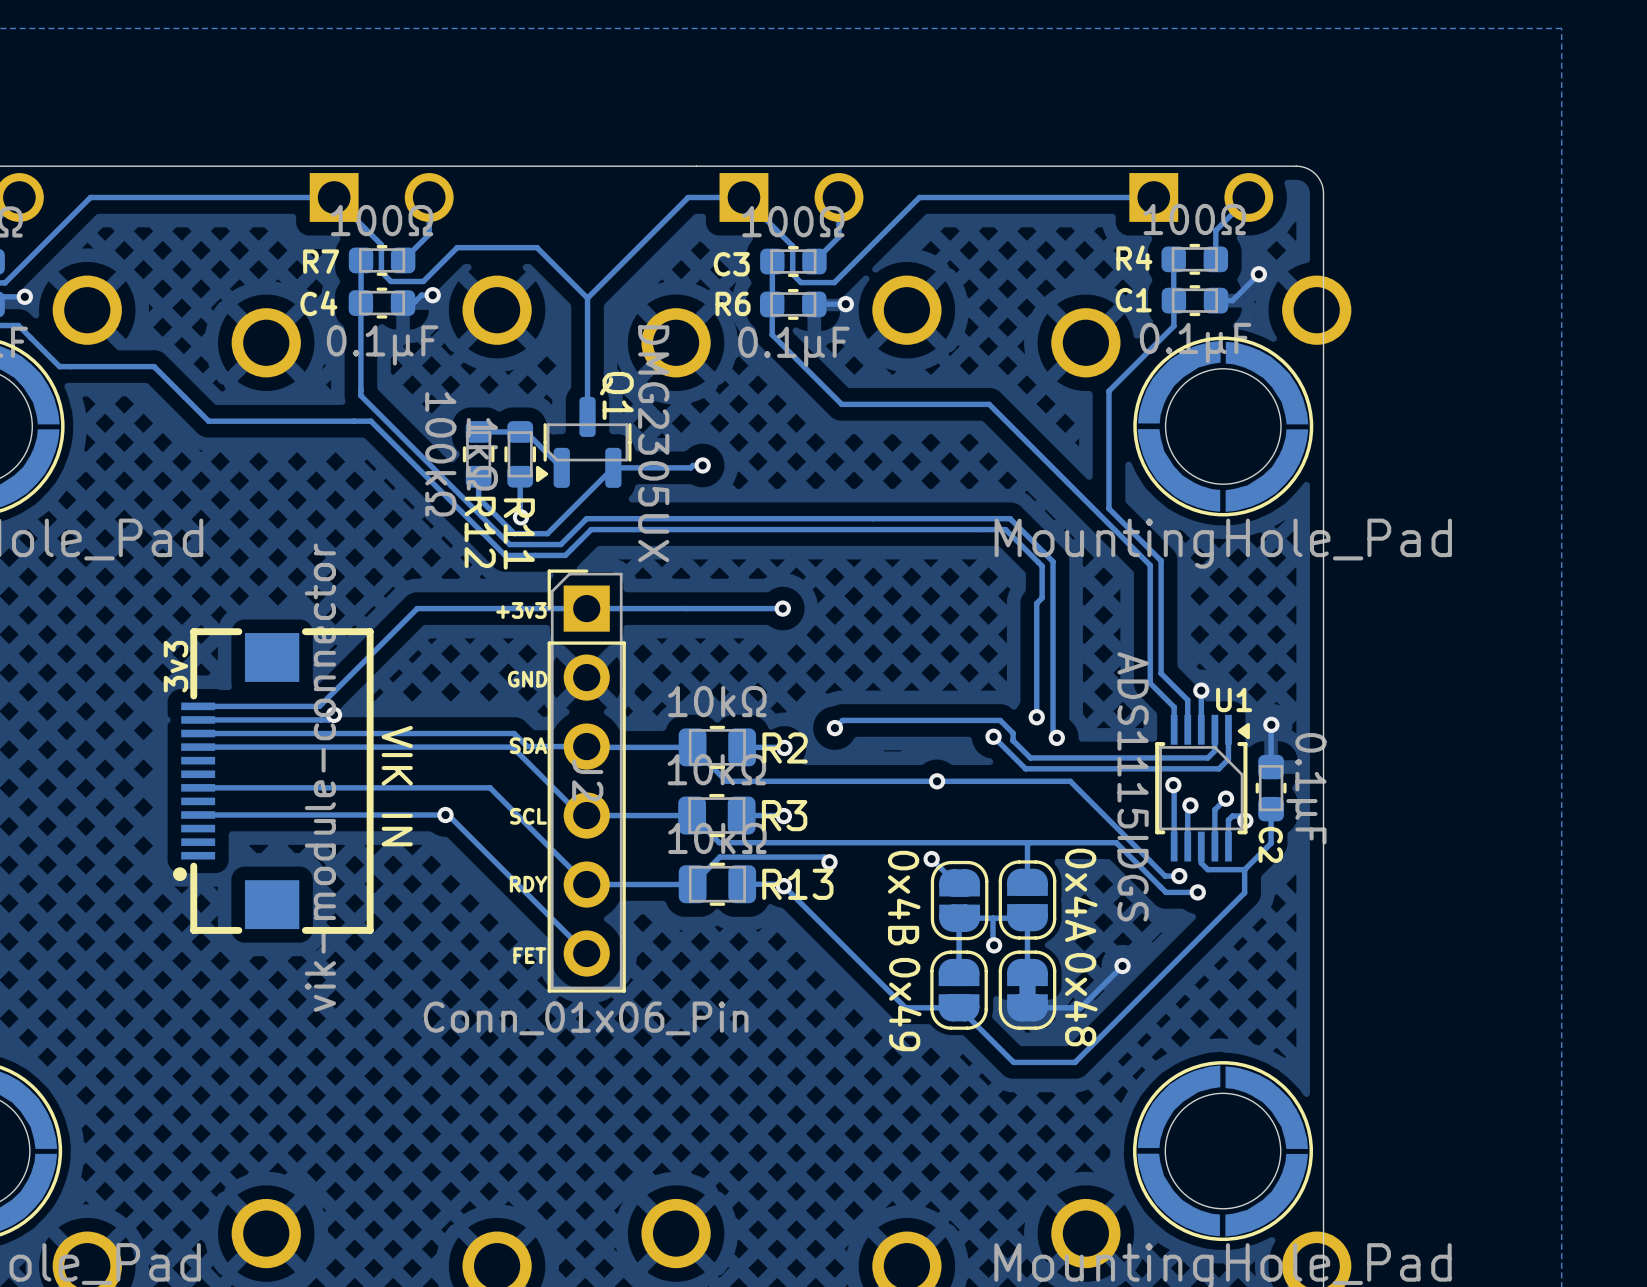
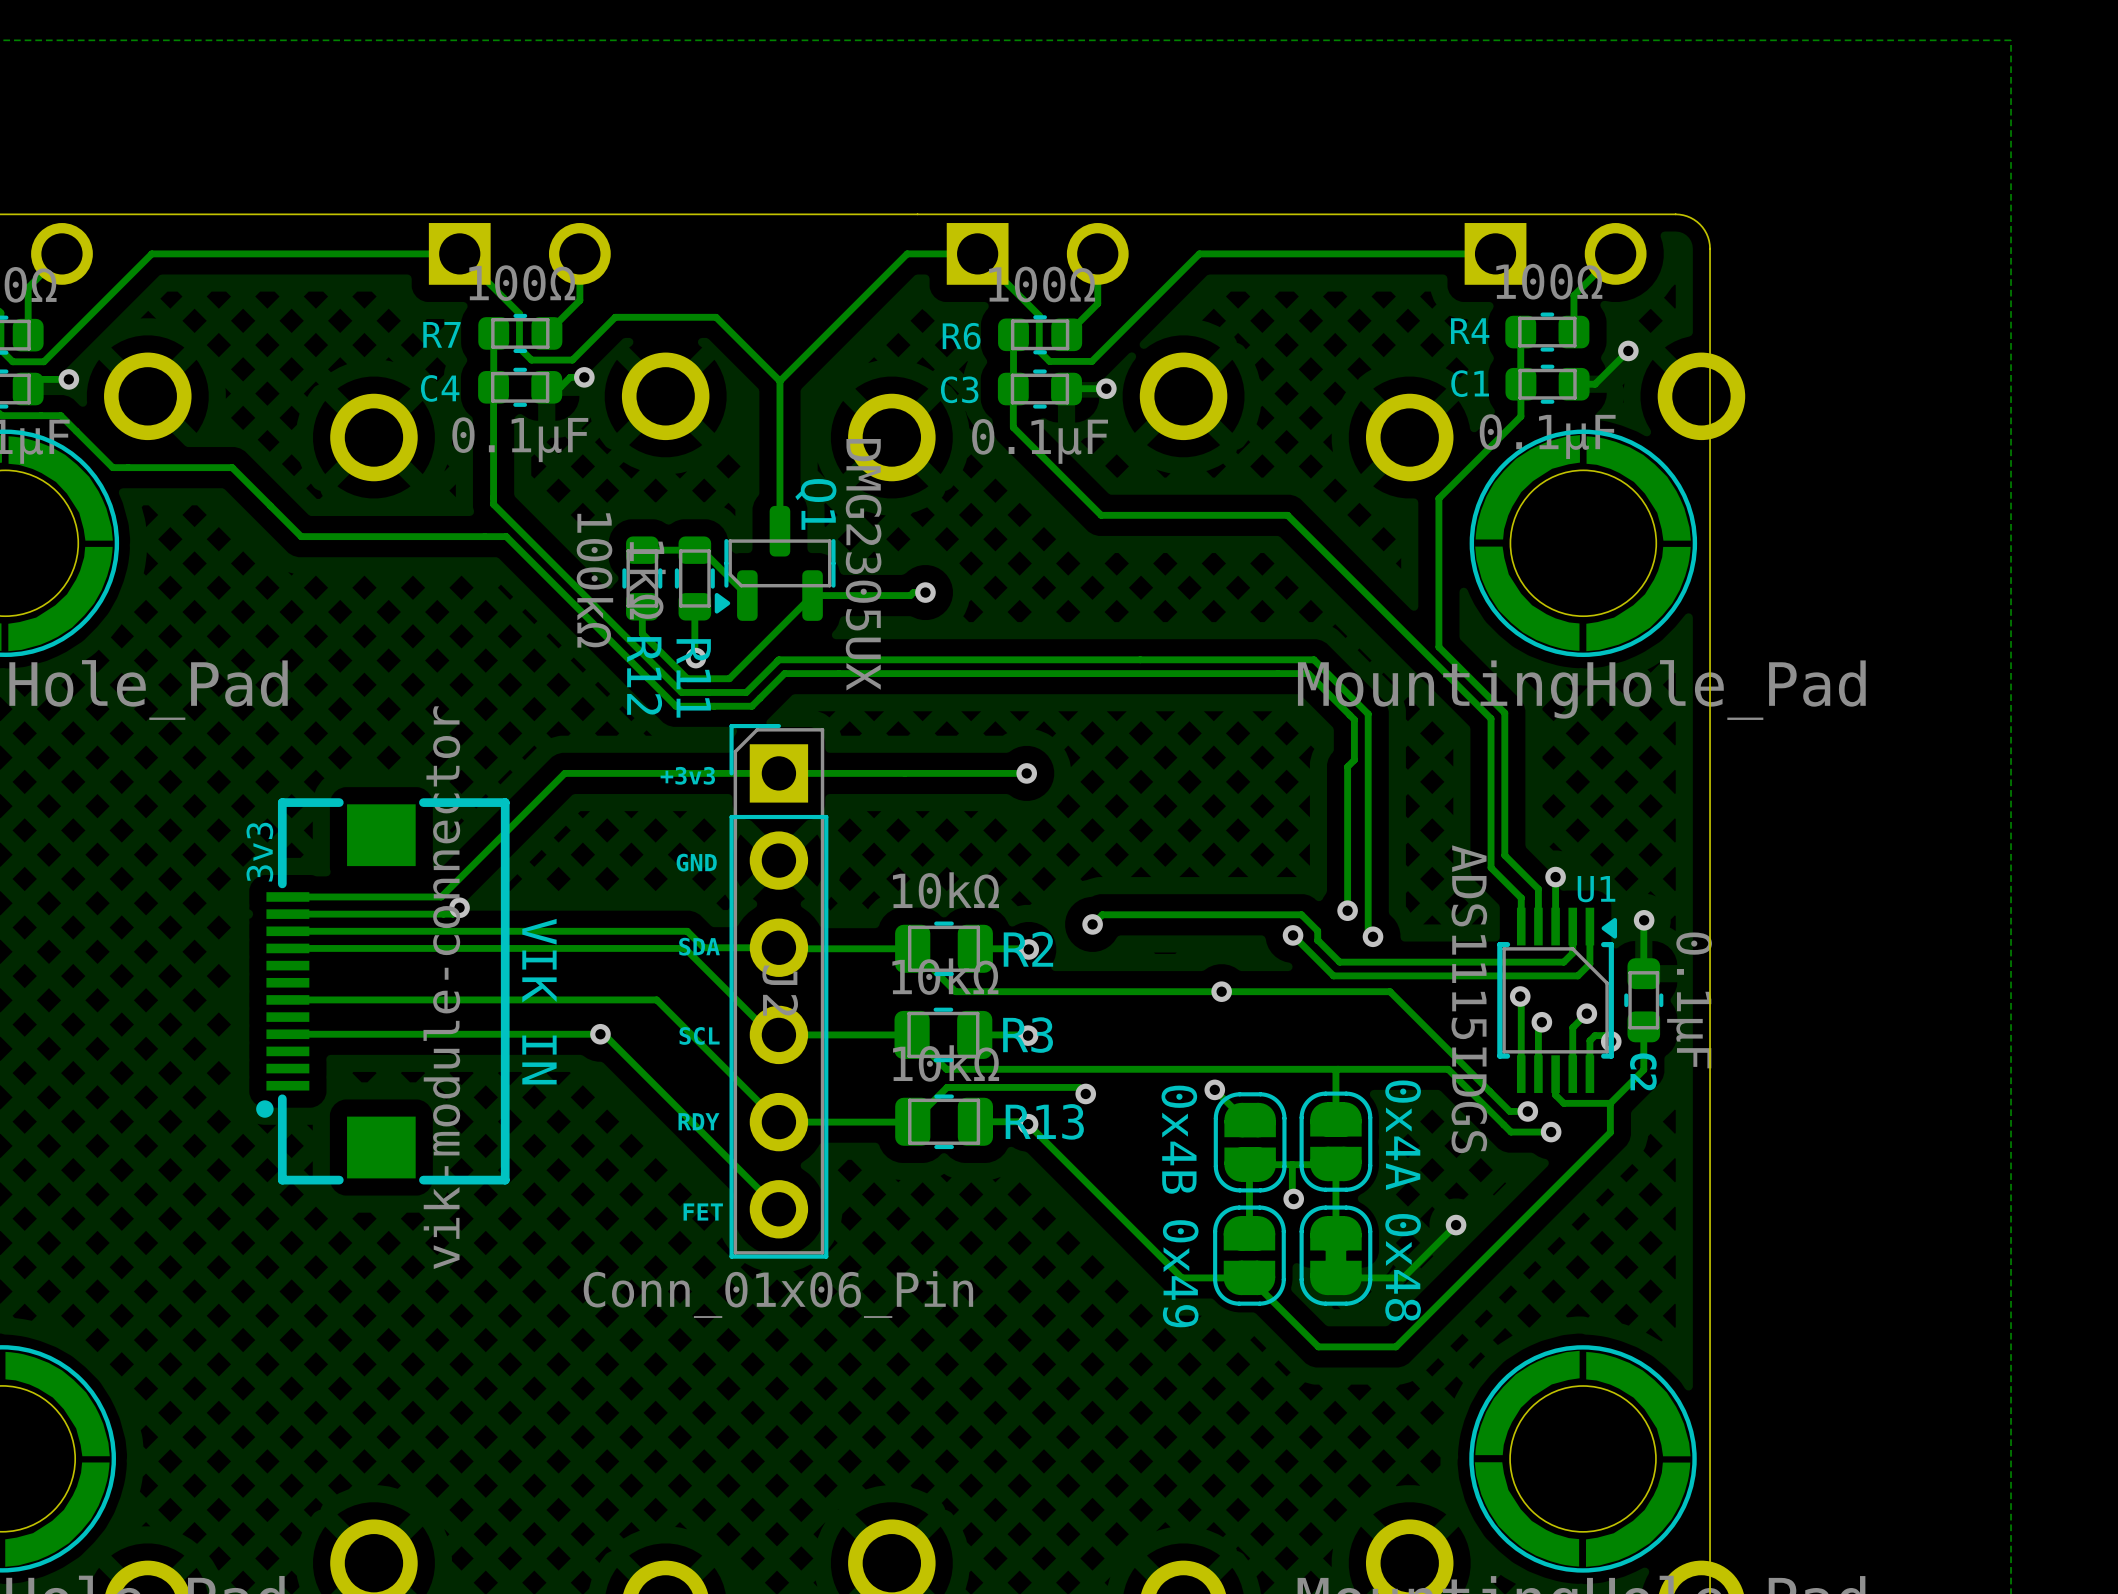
C3 name position: C3 (731, 264) -> C3 (959, 389)
R6 name position: R6 (733, 303) -> R6 (961, 336)

